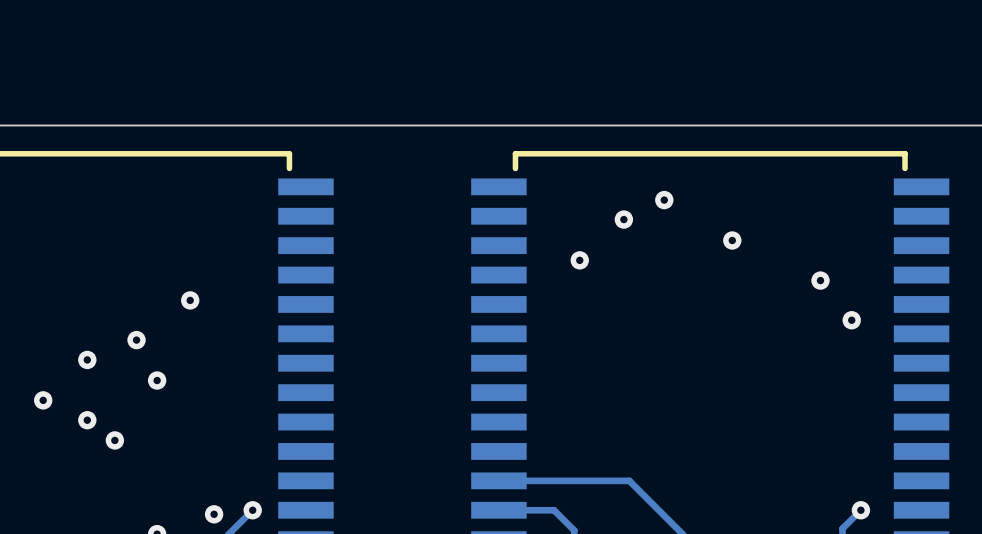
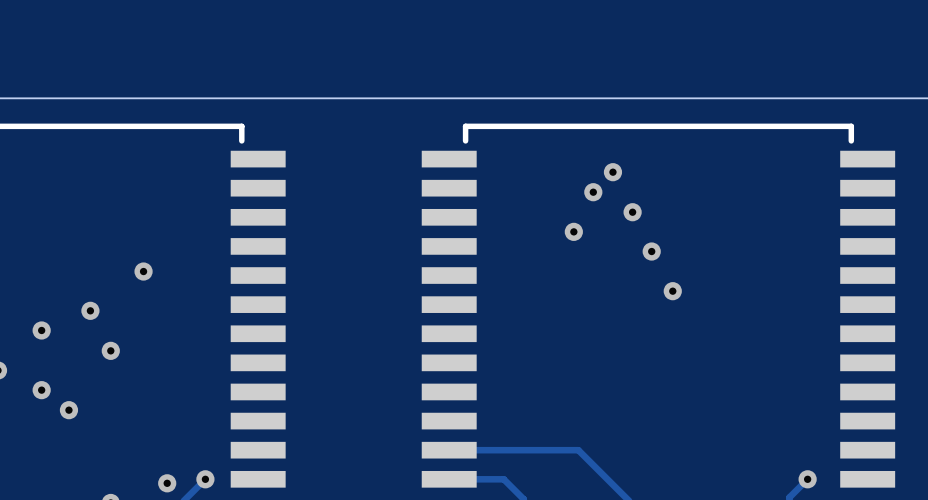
via: (623, 219) -> none
via: none -> (593, 192)
via: none -> (632, 212)
via: (732, 240) -> none
via: (579, 260) -> none
via: none -> (573, 231)
via: none -> (651, 251)
via: (820, 280) -> none
via: none -> (672, 291)
via: (851, 320) -> none

